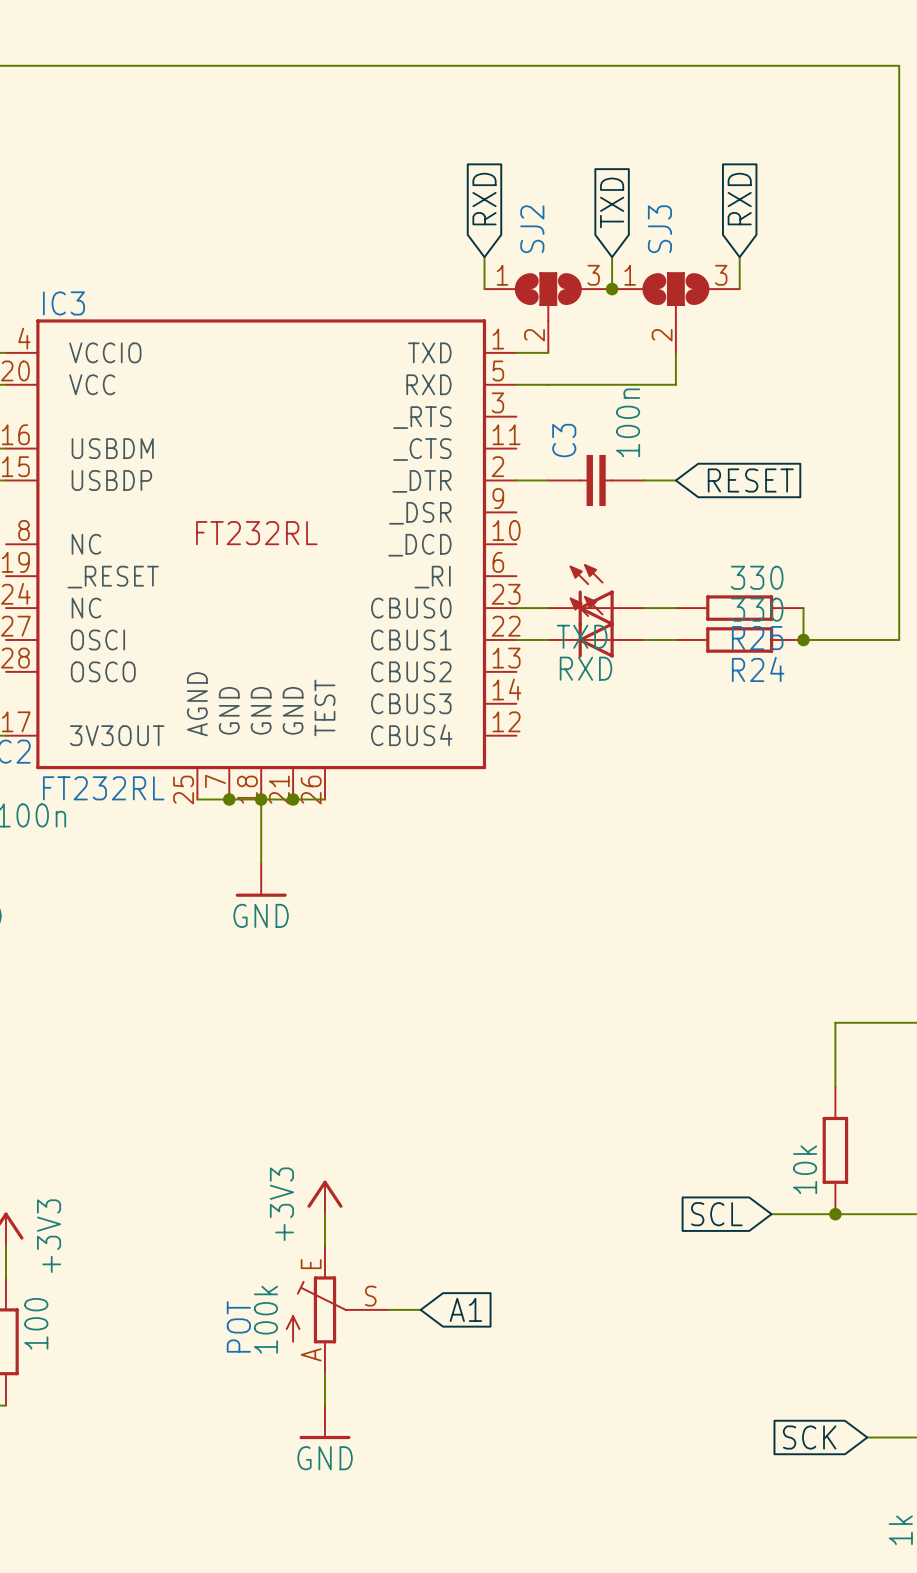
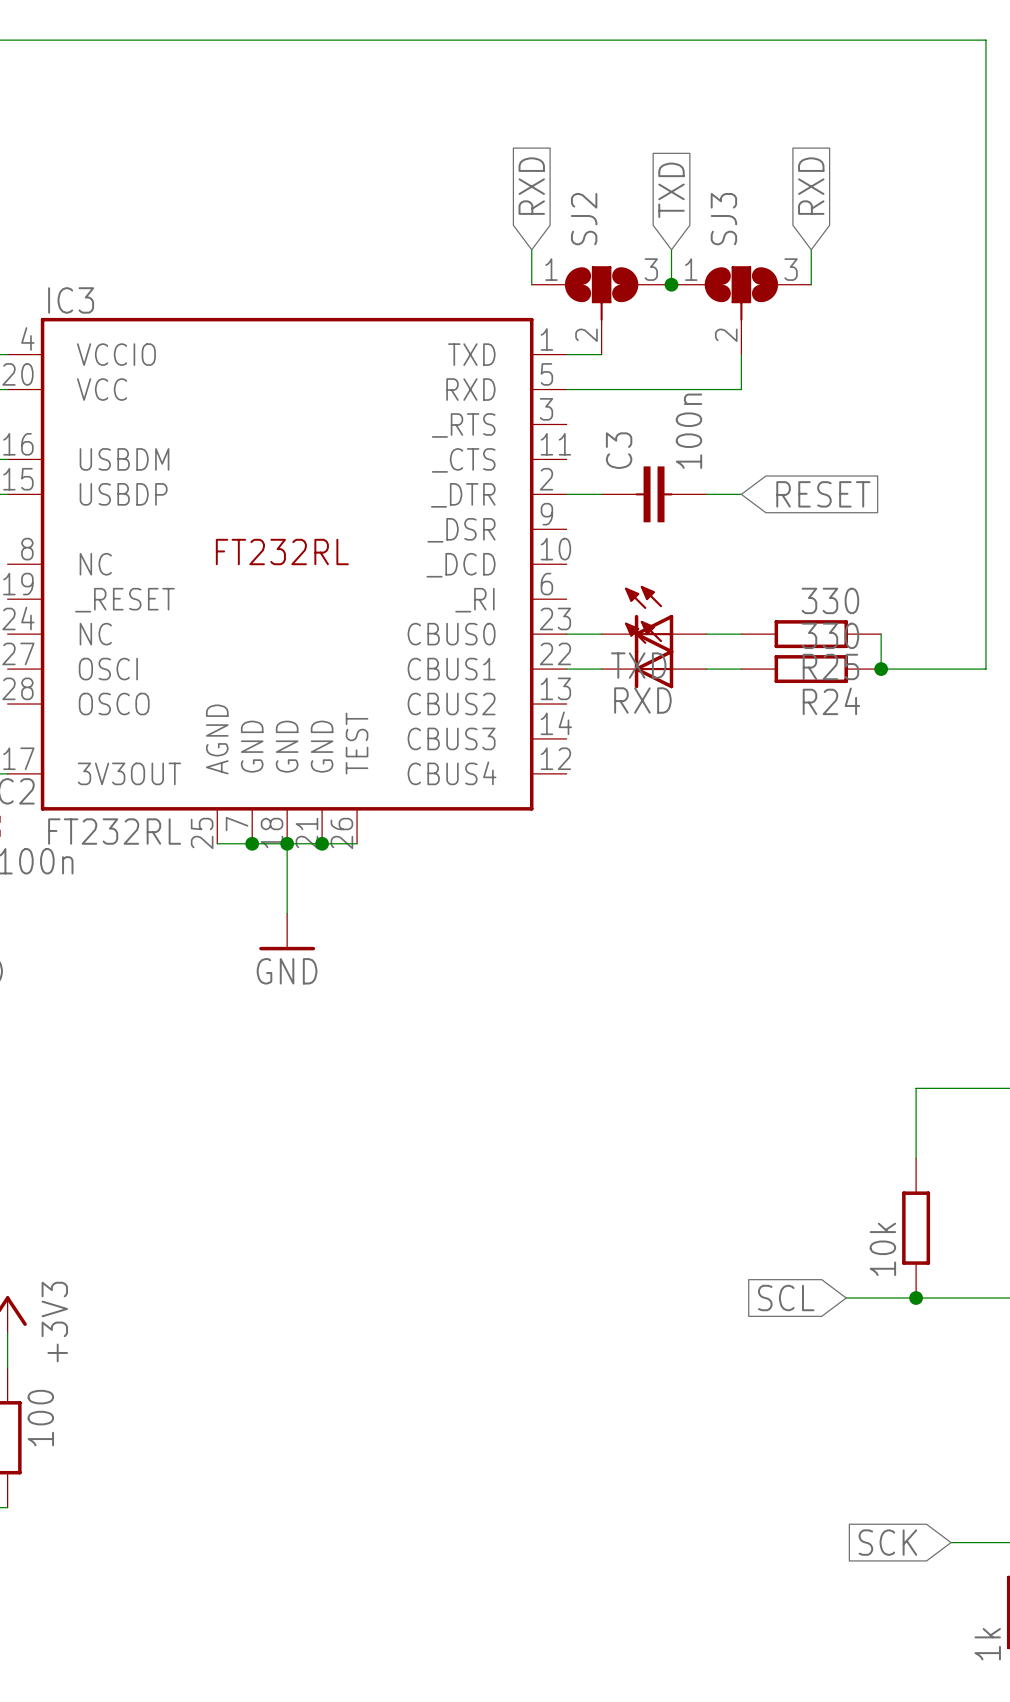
power symbol: +3V3 (324, 1197) -> none
wire: (324, 1214) (324, 1246) -> none
POT: 100k (337, 1309) -> none
wire: (388, 1309) (420, 1309) -> none
global label: A1 (465, 1309) -> none
wire: (324, 1373) (324, 1405) -> none
power symbol: GND (324, 1422) -> none

